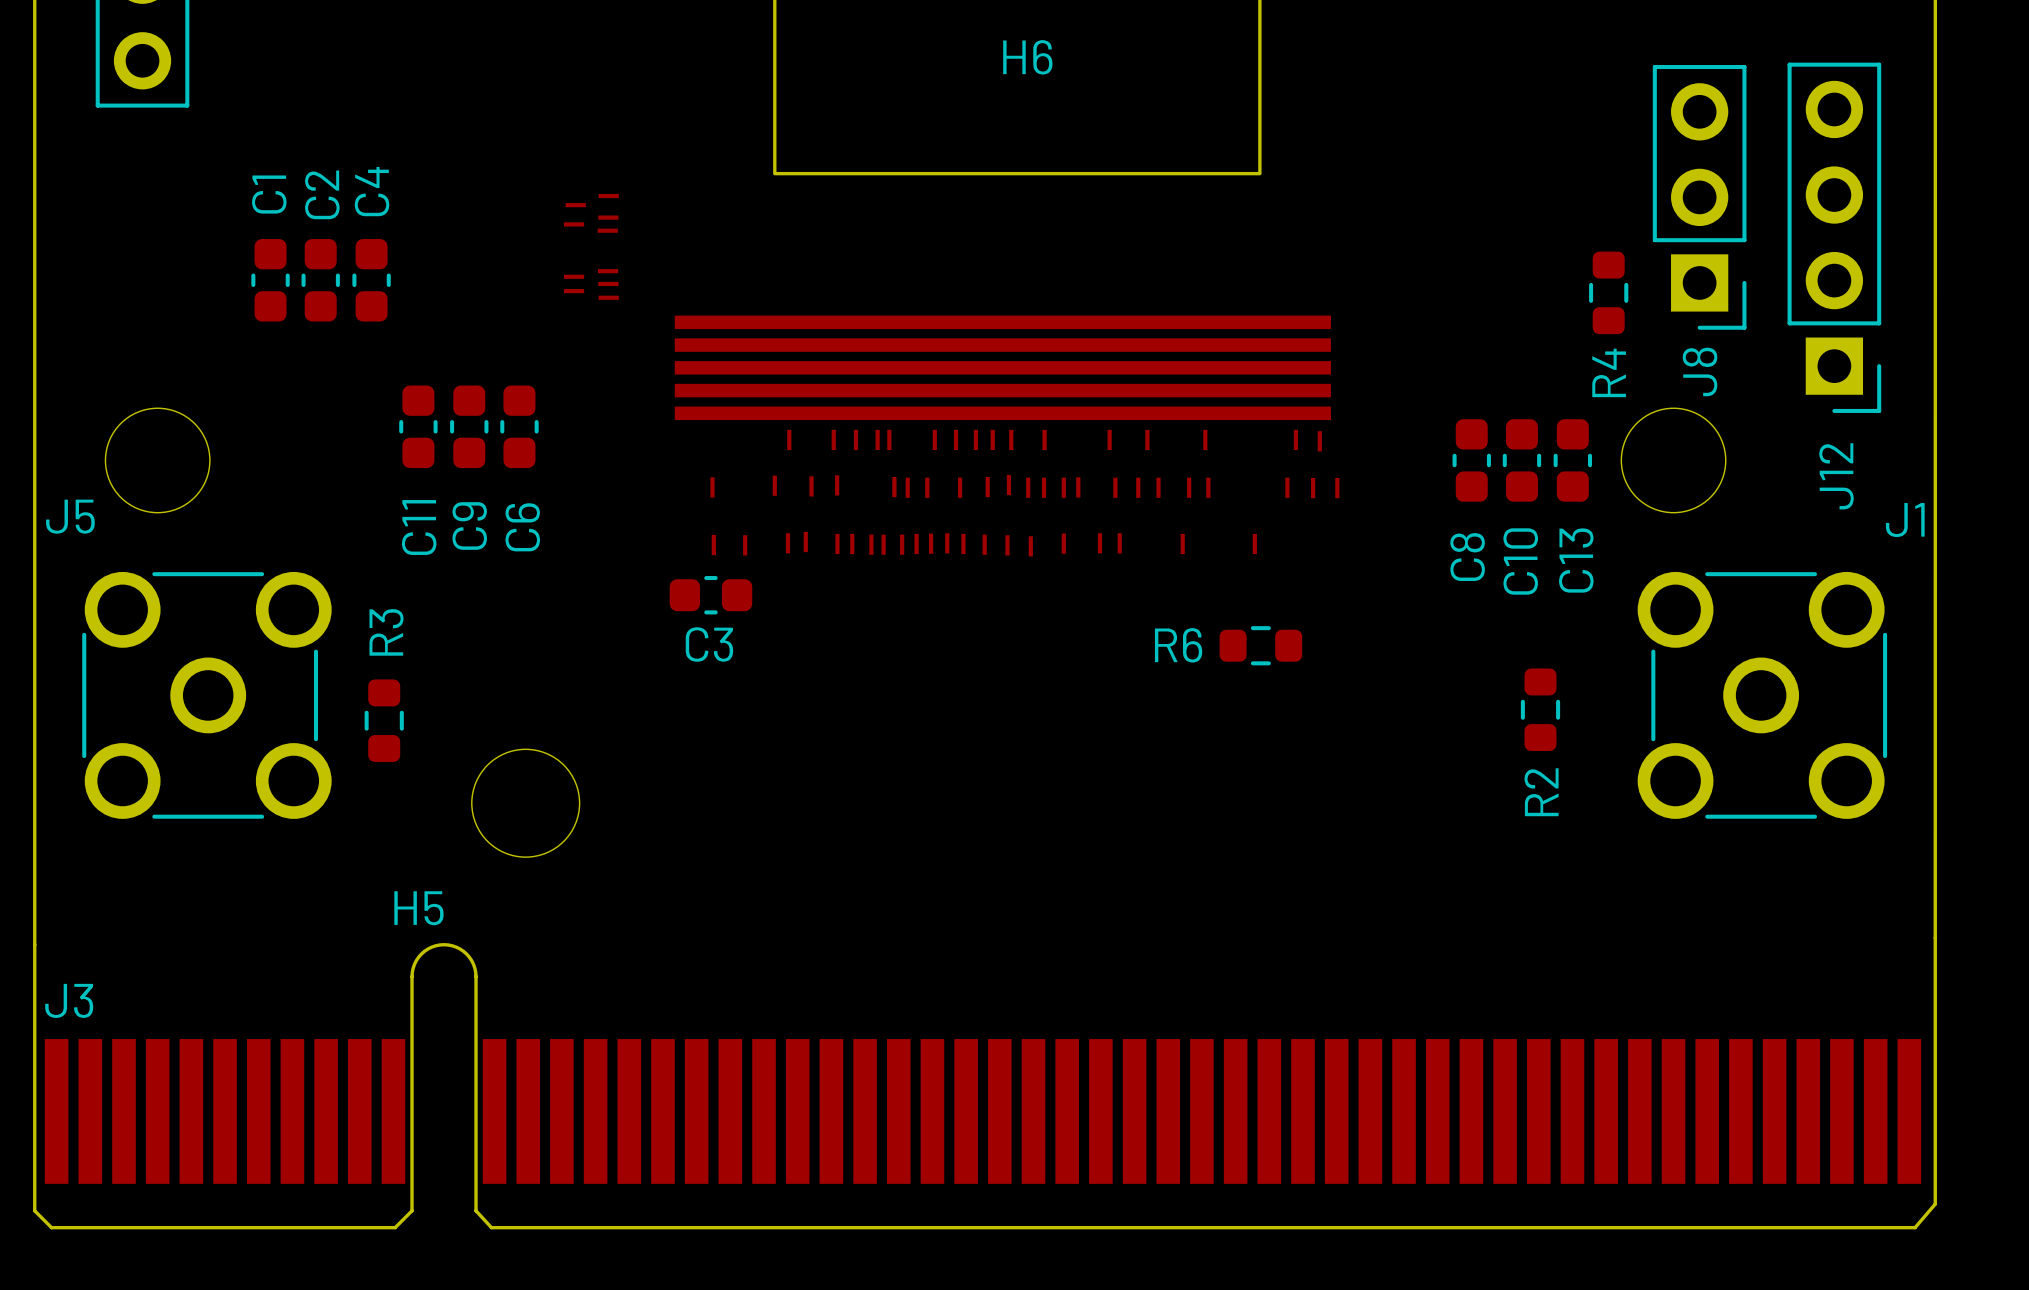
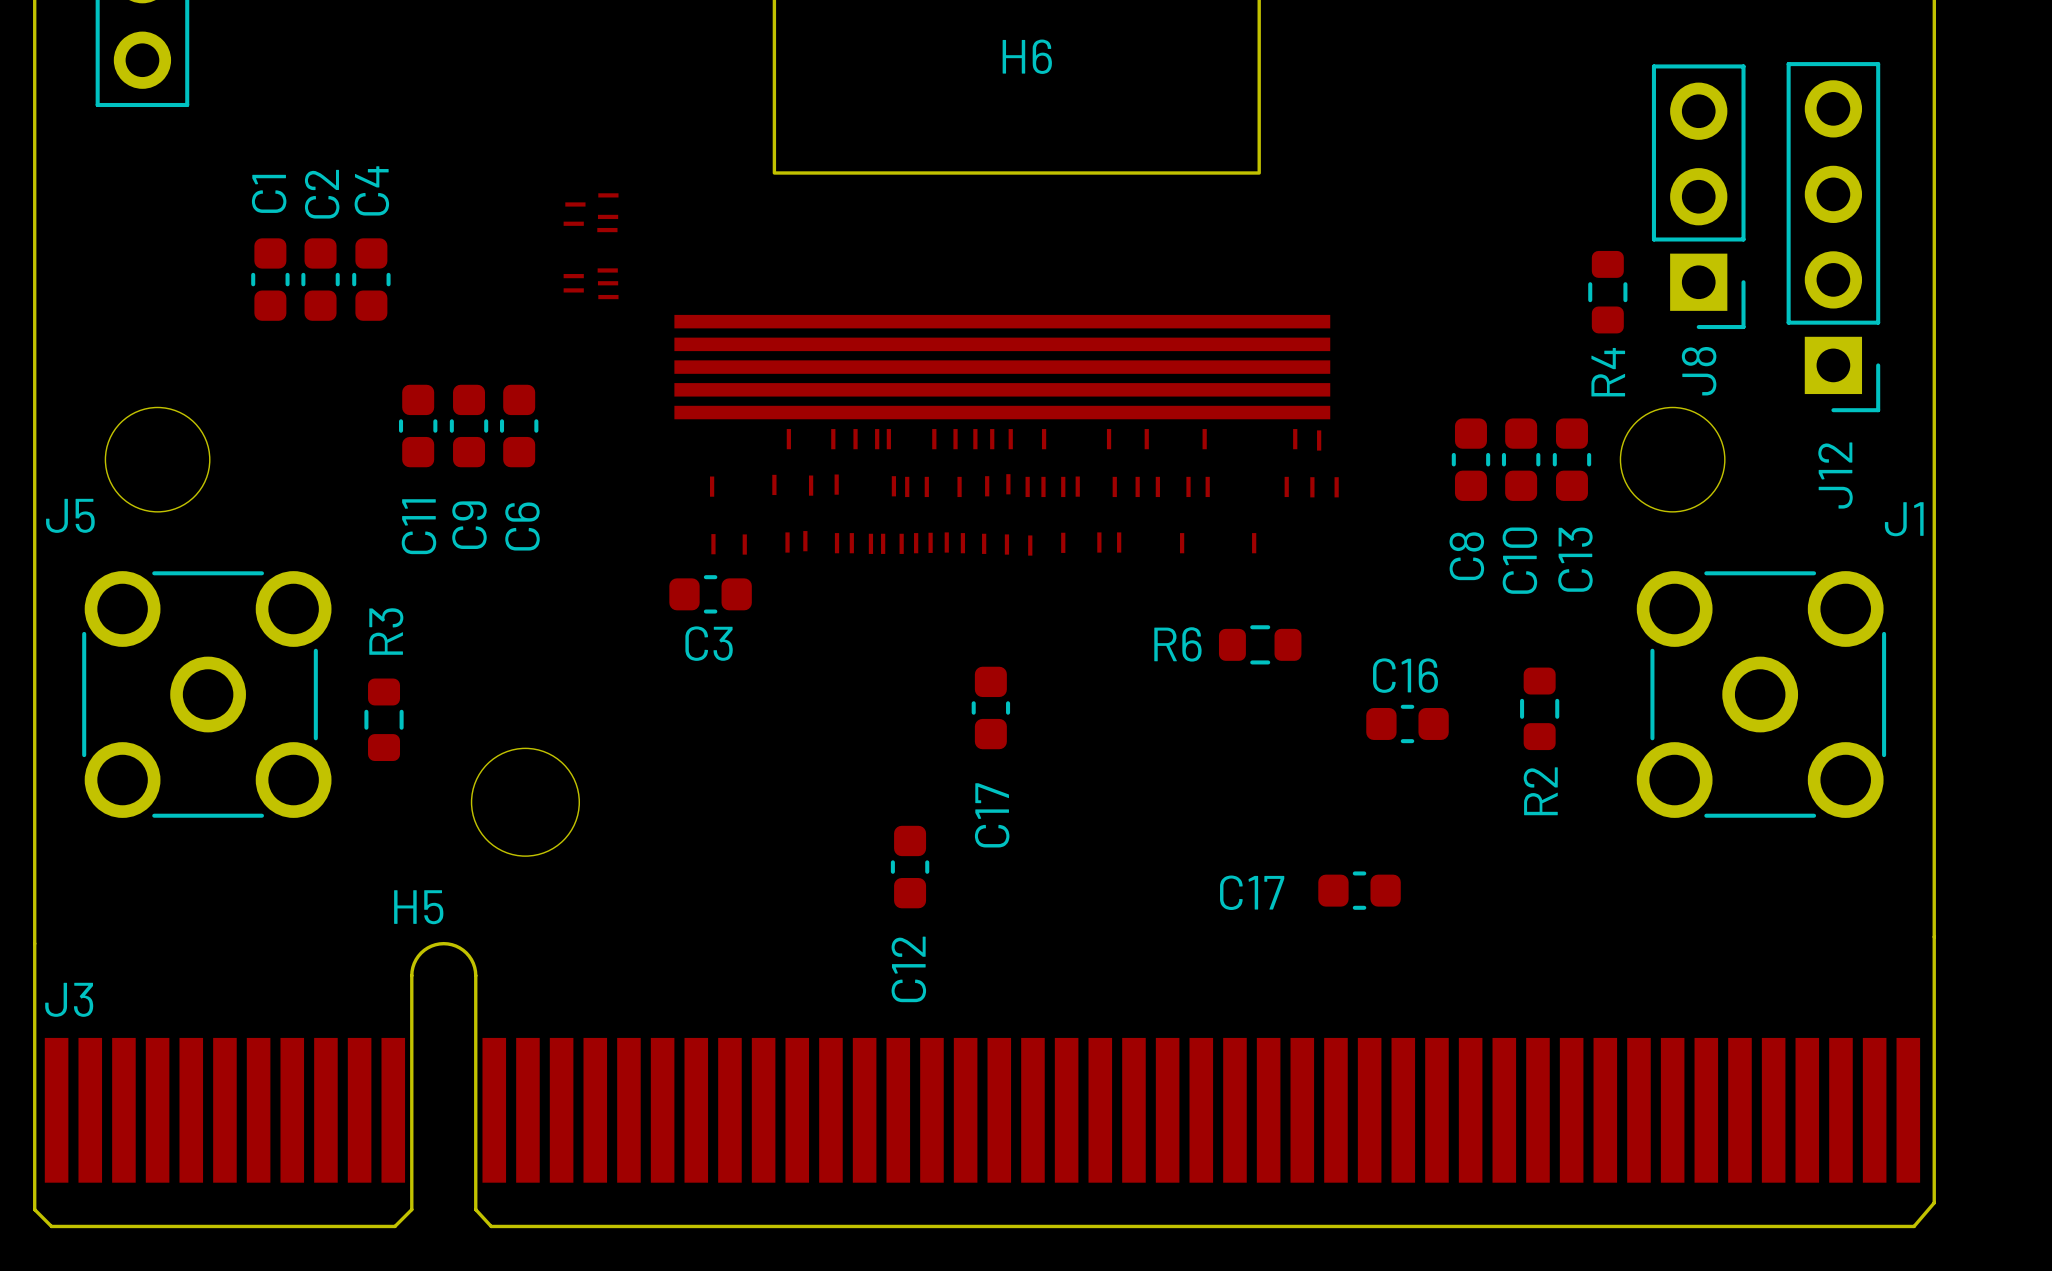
C17: none -> (990, 707)
C16: none -> (1407, 723)
C12: none -> (910, 867)
C17: none -> (1359, 890)

